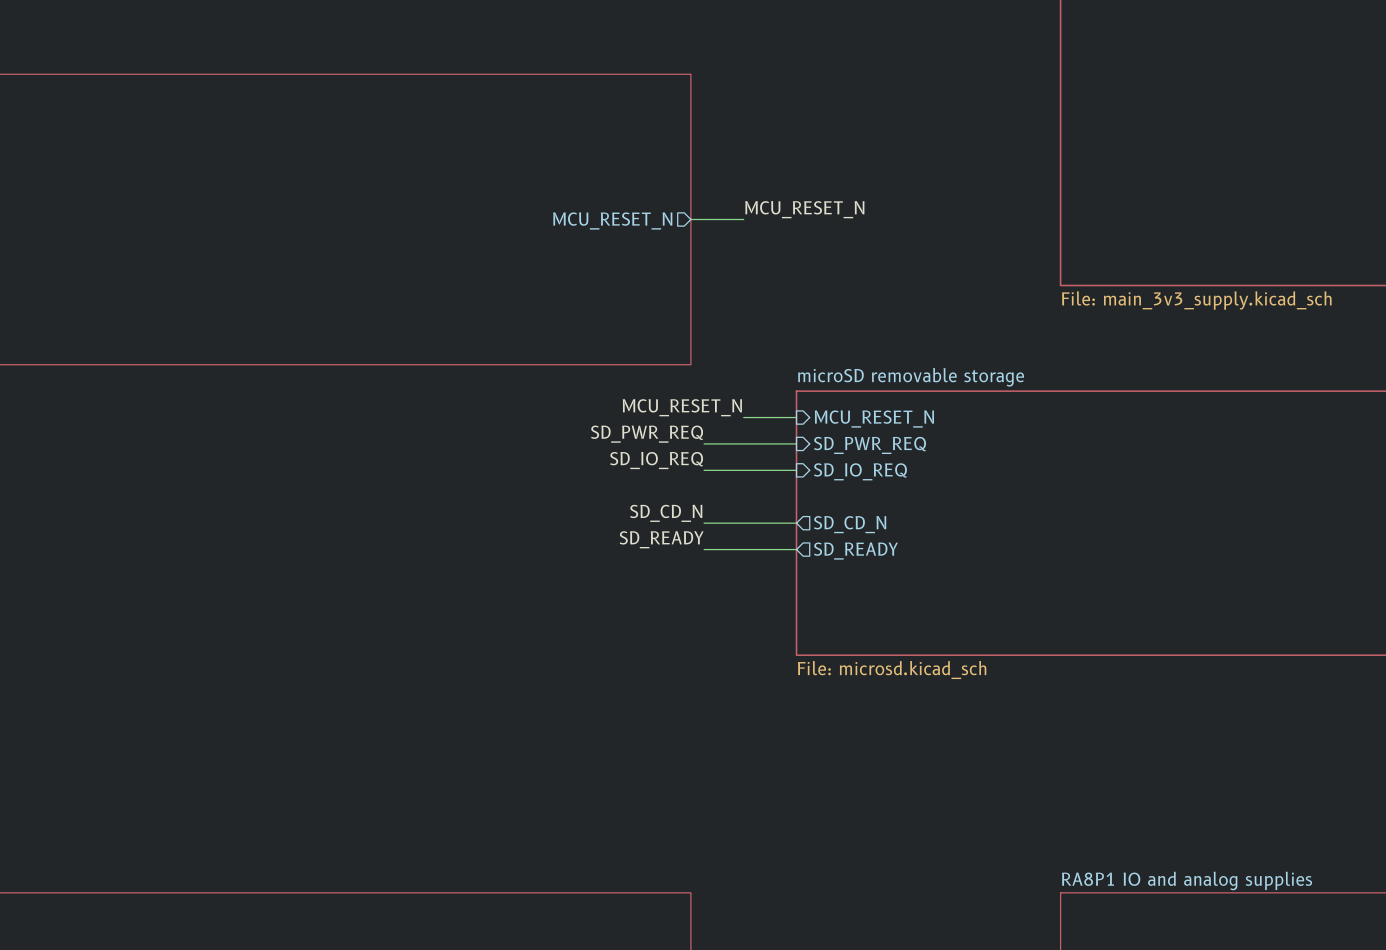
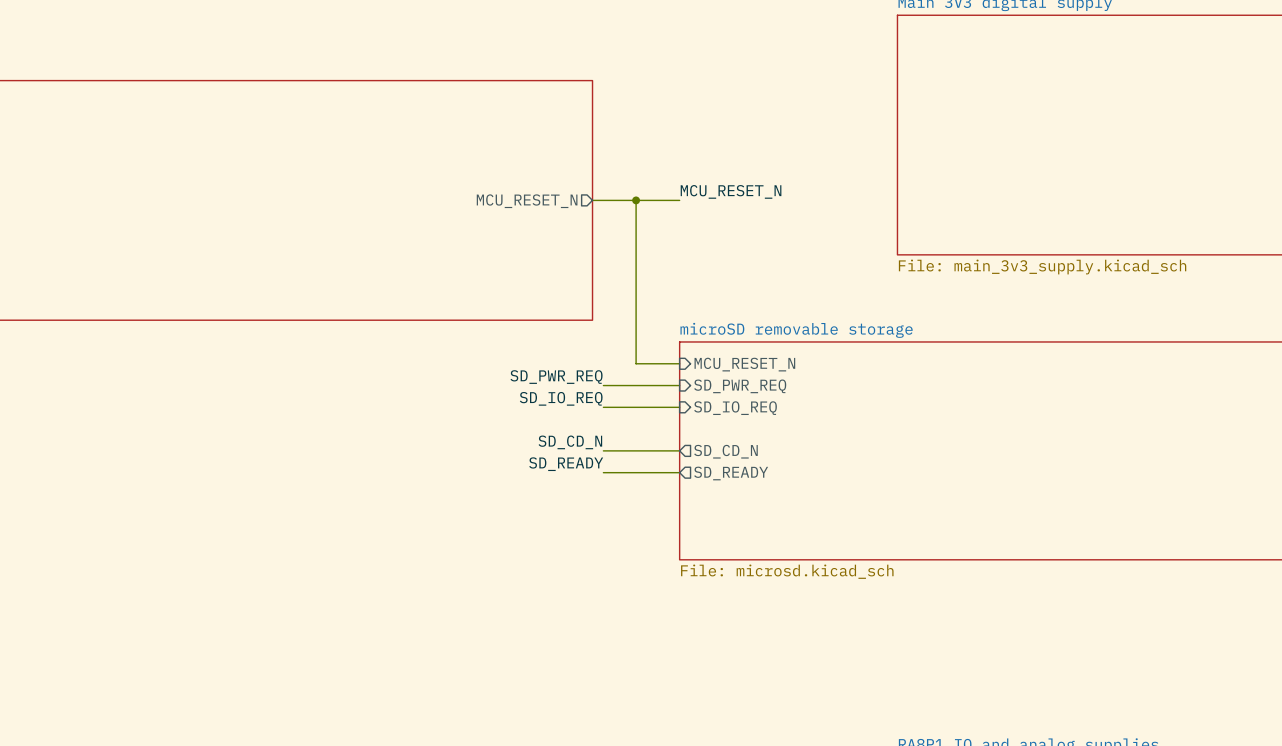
label position: MCU_RESET_N (804, 209) -> MCU_RESET_N (731, 191)
junction: none -> (636, 200)
wire: none -> (679, 200) (636, 200) (636, 363)
label: MCU_RESET_N (682, 407) -> none

